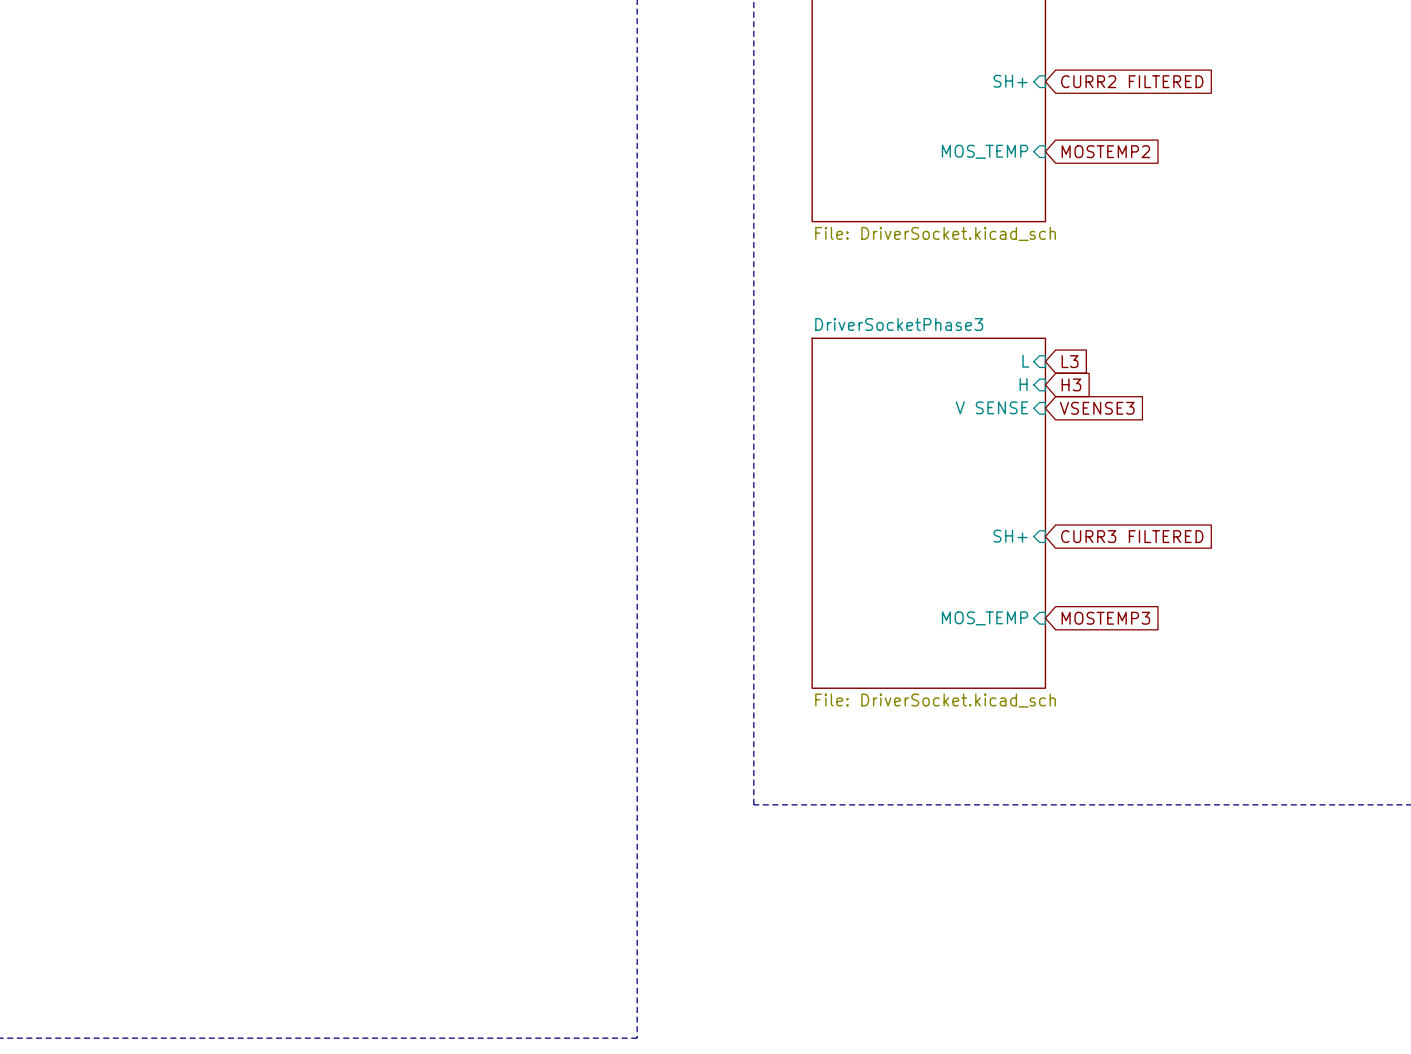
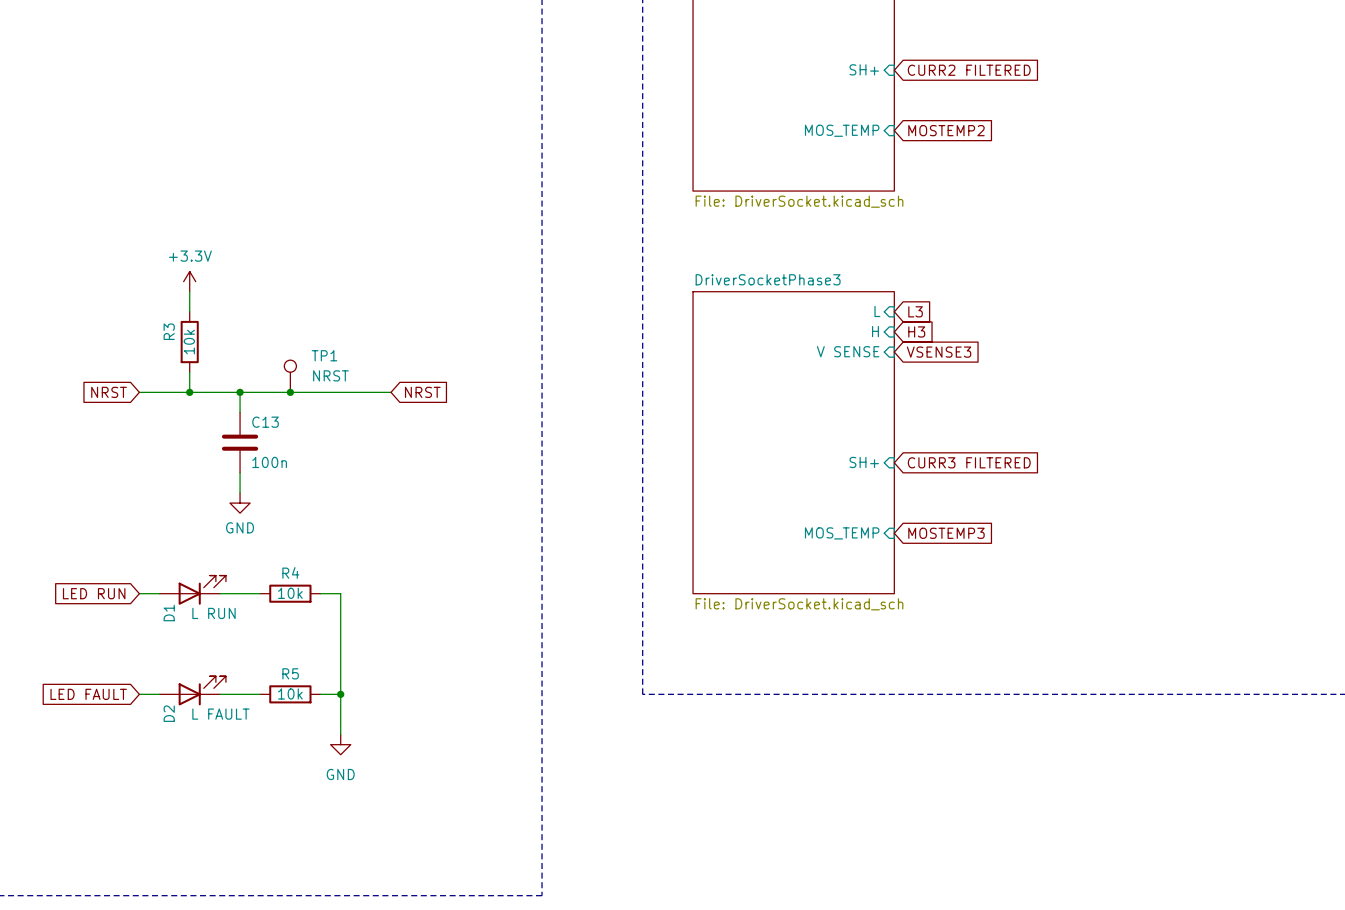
power symbol: none -> +3.3V (189, 281)
wire: none -> (189, 291) (189, 311)
R3: none -> 10k (189, 342)
wire: none -> (189, 372) (189, 392)
TP1: none -> NRST (290, 376)
global label: none -> NRST (109, 392)
wire: none -> (139, 392) (391, 392)
junction: none -> (189, 392)
wire: none -> (240, 392) (240, 412)
junction: none -> (240, 392)
junction: none -> (290, 392)
global label: none -> NRST (422, 392)
C13: none -> 100n (240, 442)
wire: none -> (240, 472) (240, 493)
power symbol: none -> GND (240, 503)
D1: none -> L RUN (192, 590)
global label: none -> LED RUN (94, 593)
wire: none -> (139, 593) (159, 593)
wire: none -> (219, 593) (260, 593)
R4: none -> 10k (290, 593)
wire: none -> (320, 593) (340, 593) (340, 734)
D2: none -> L FAULT (192, 690)
global label: none -> LED FAULT (88, 694)
wire: none -> (139, 694) (159, 694)
wire: none -> (219, 694) (260, 694)
R5: none -> 10k (290, 694)
wire: none -> (320, 694) (340, 694)
junction: none -> (340, 694)
power symbol: none -> GND (340, 744)

